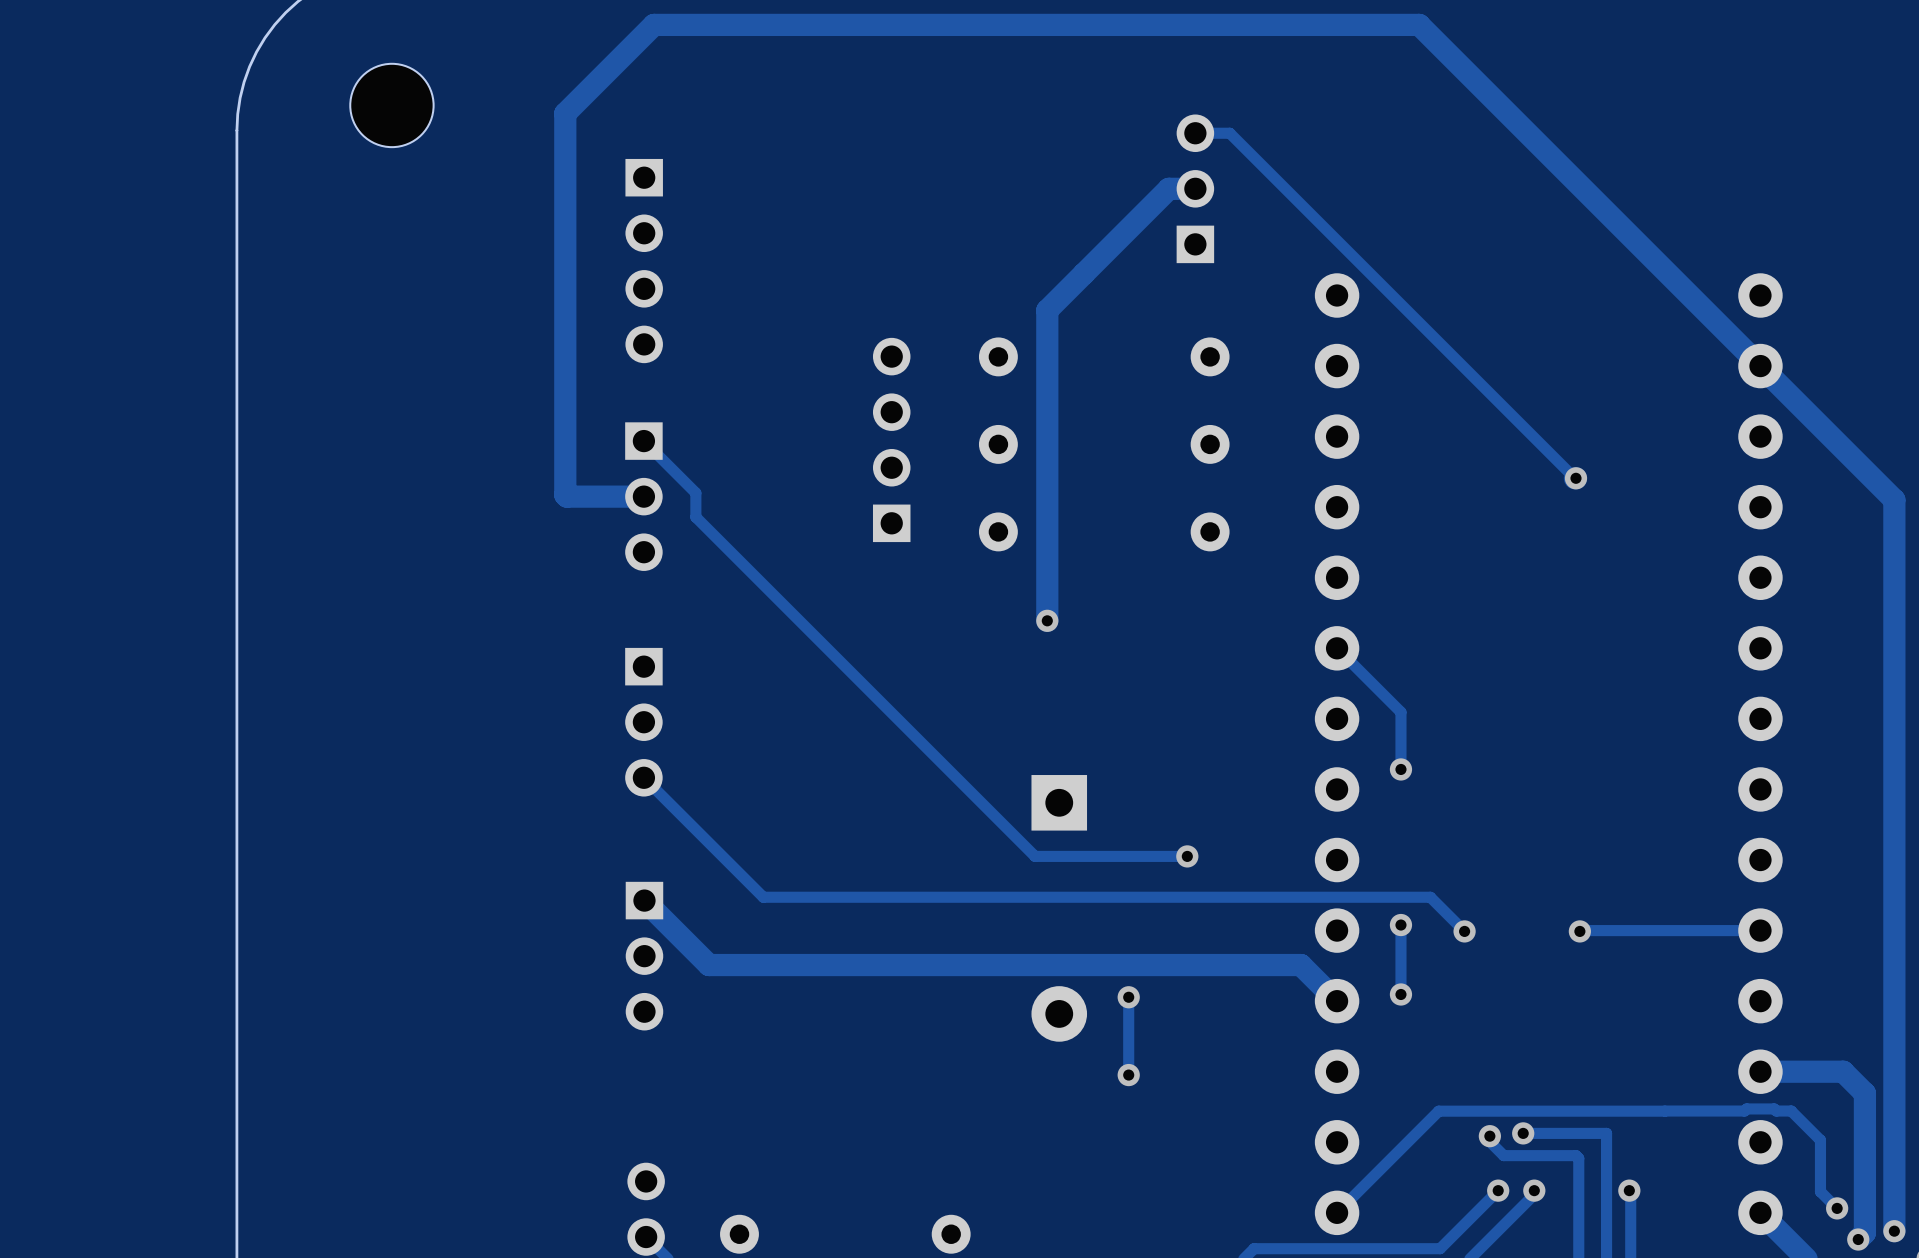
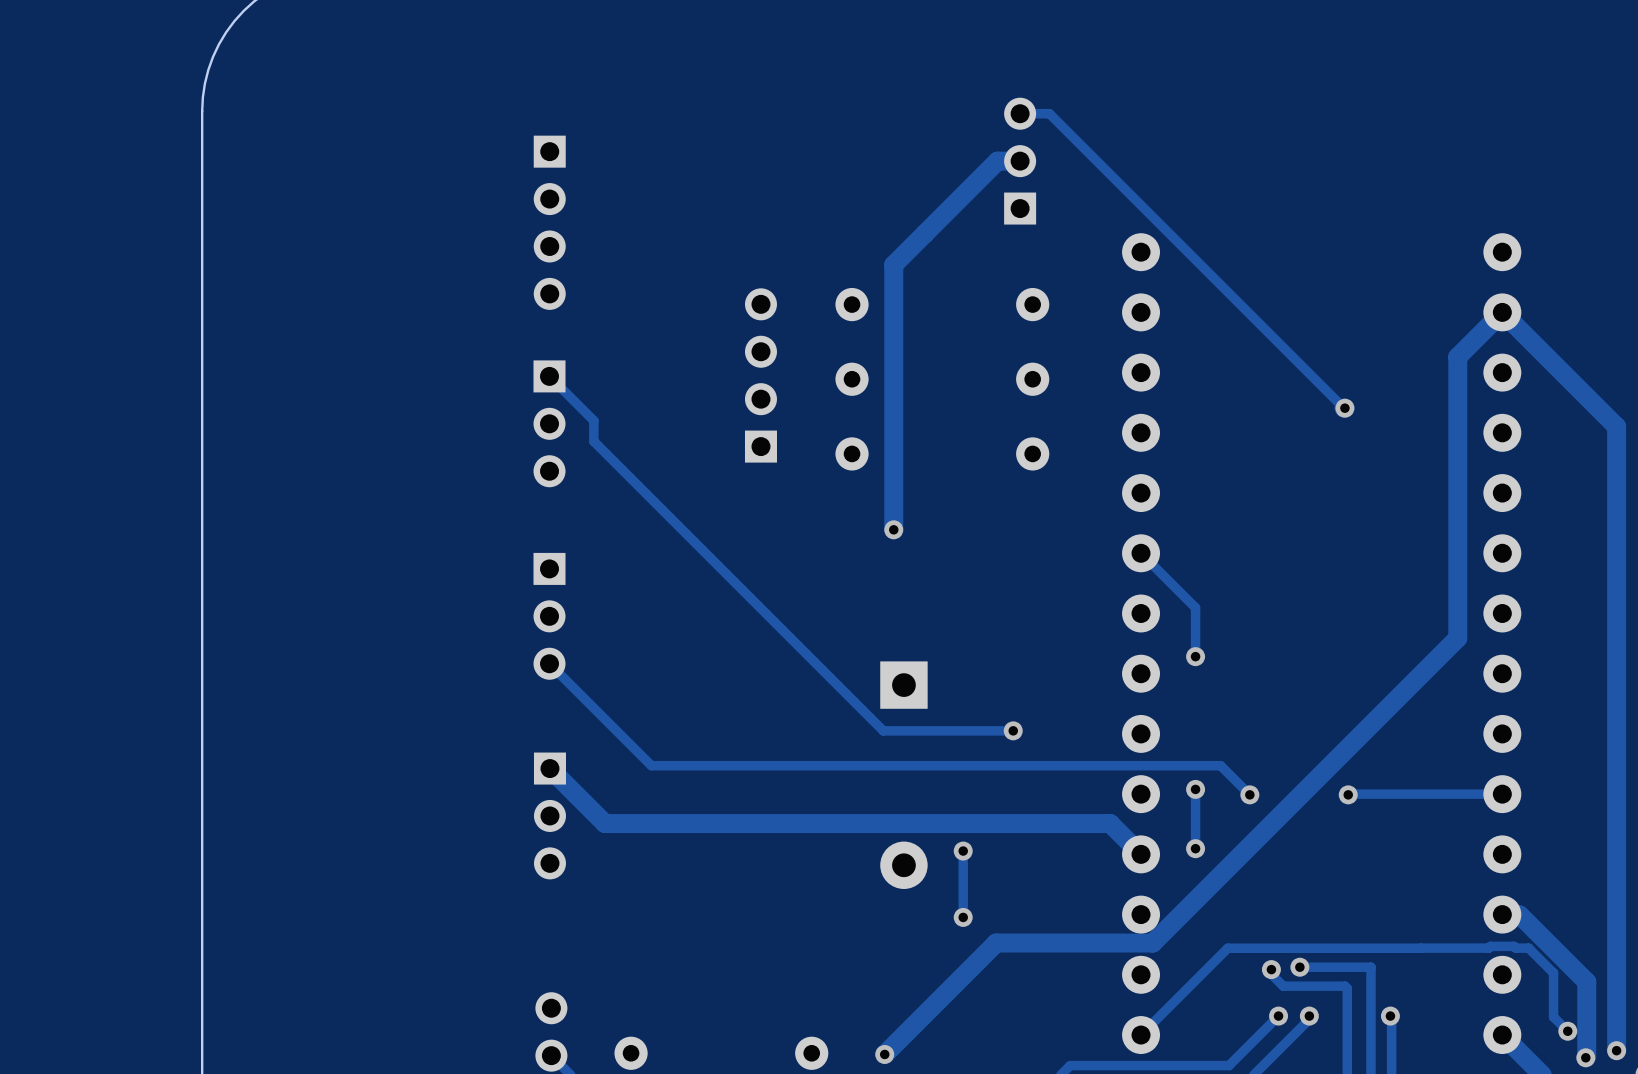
part: (391, 105) -> none
track: (1760, 366) (1419, 24) (653, 24) (565, 113) (565, 494) (566, 496) (643, 496) -> (1502, 312) (1457, 356) (1457, 638) (1152, 943) (996, 943) (884, 1054)
track: (1780, 1071) (1843, 1071) (1864, 1093) (1864, 1232) (1859, 1238) -> (1519, 914) (1586, 981) (1586, 1056)
via: none -> (884, 1054)

